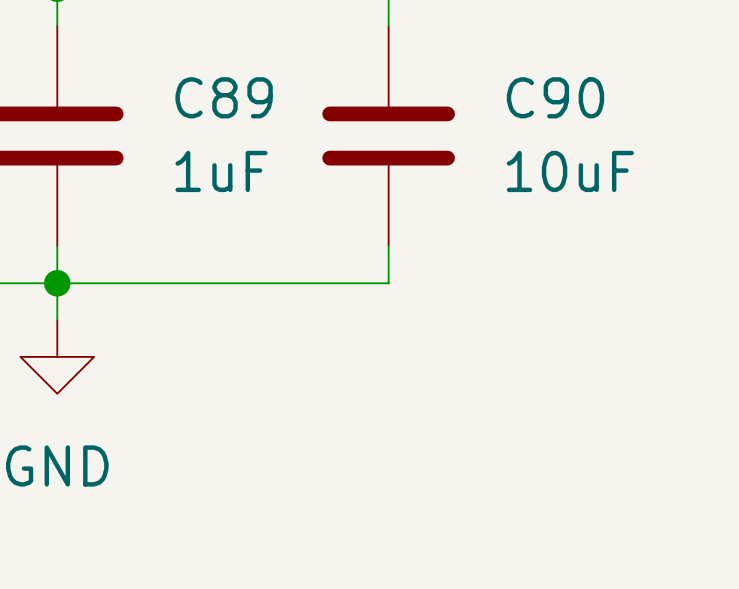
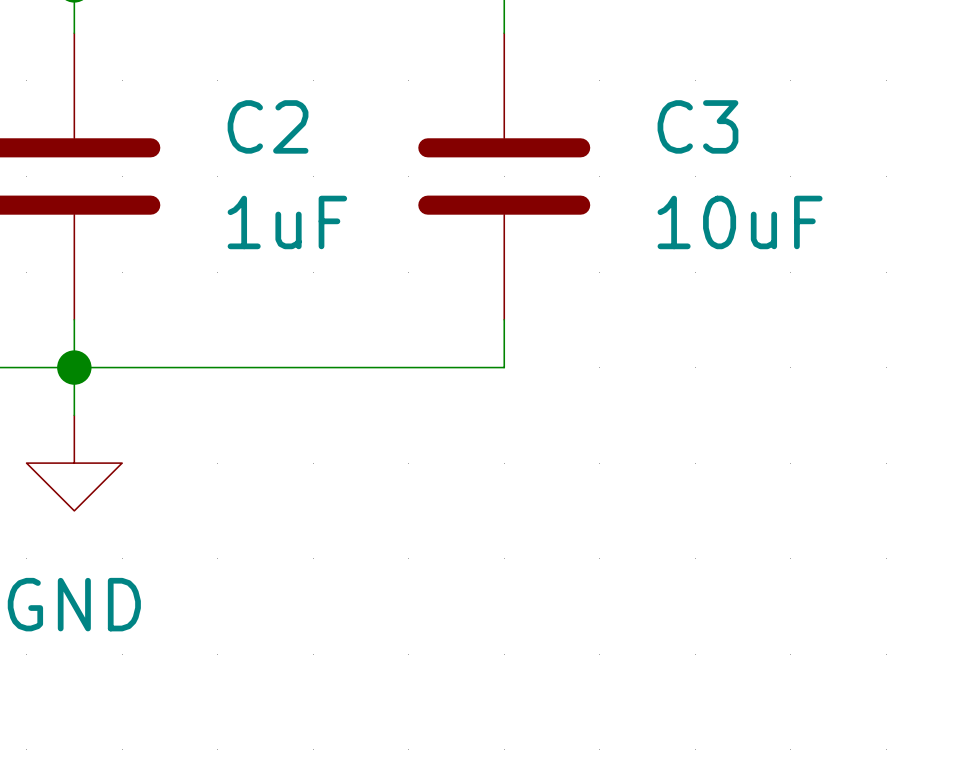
C89 name: C89 (224, 97) -> C2 (268, 126)
C90 name: C90 (555, 97) -> C3 (697, 126)

